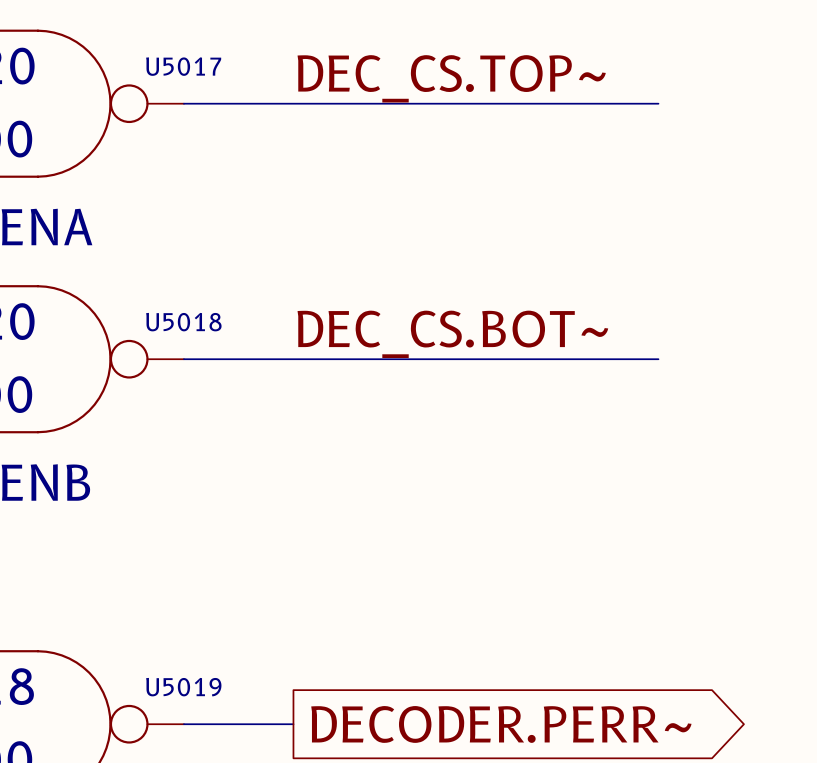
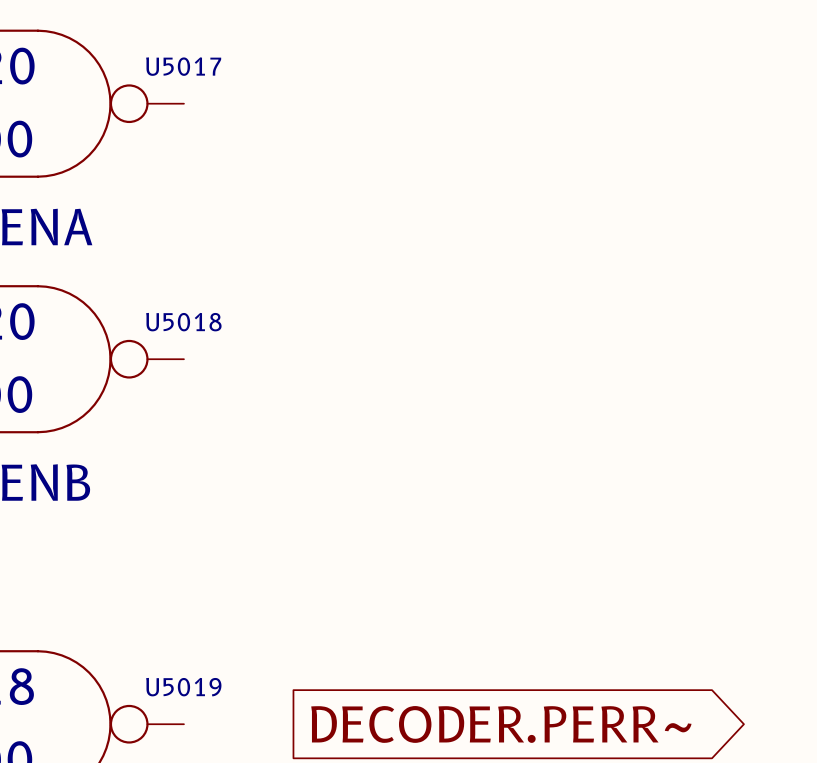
label: DEC_CS.TOP~ (451, 78) -> none
wire: (183, 103) (658, 103) -> none
label: DEC_CS.BOT~ (452, 334) -> none
wire: (183, 359) (658, 359) -> none
wire: (183, 724) (293, 724) -> none

